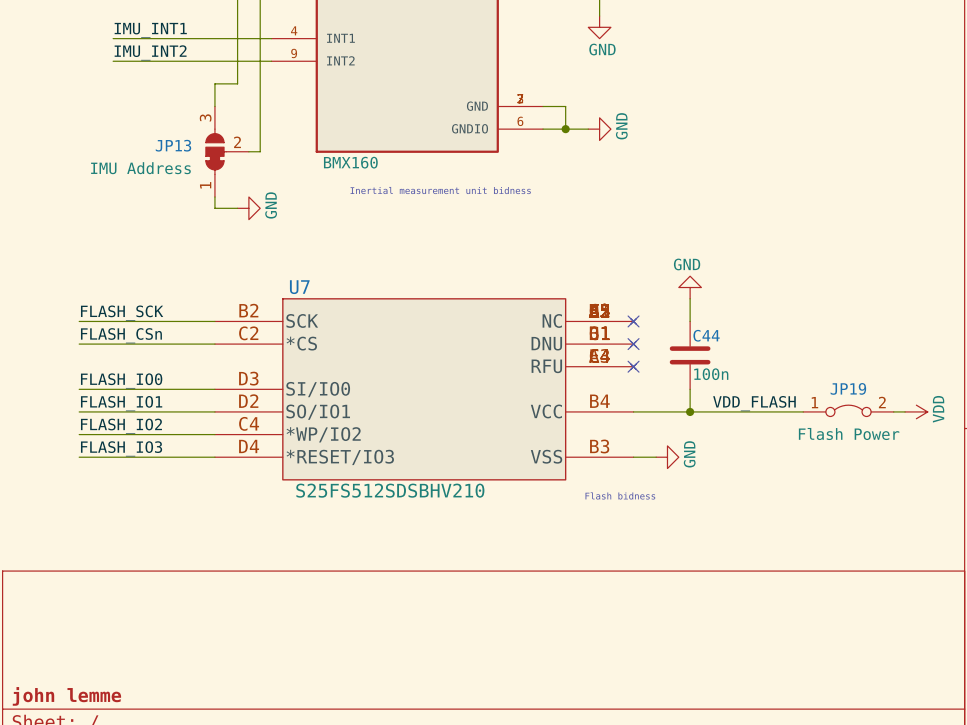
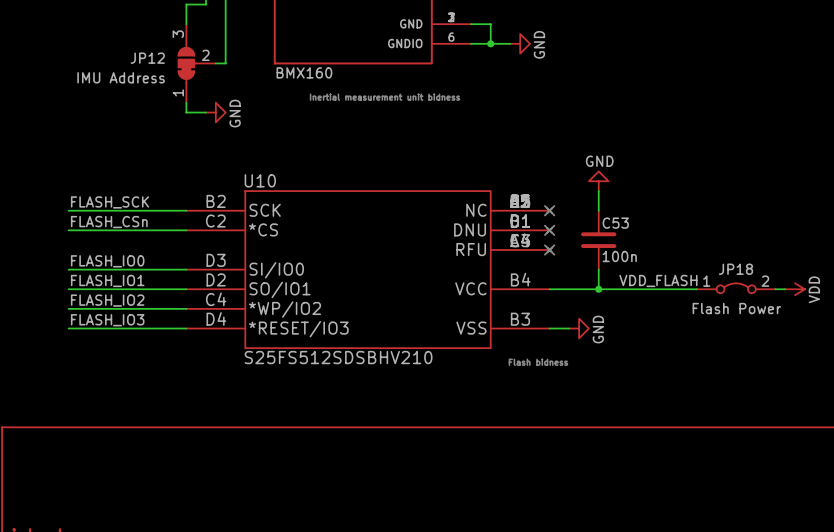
JP13 name: JP13 (173, 145) -> JP12 (147, 58)
U7 name: U7 (299, 287) -> U10 (260, 180)
C44 name: C44 (706, 335) -> C53 (615, 223)
JP19 name: JP19 (848, 388) -> JP18 (735, 269)

